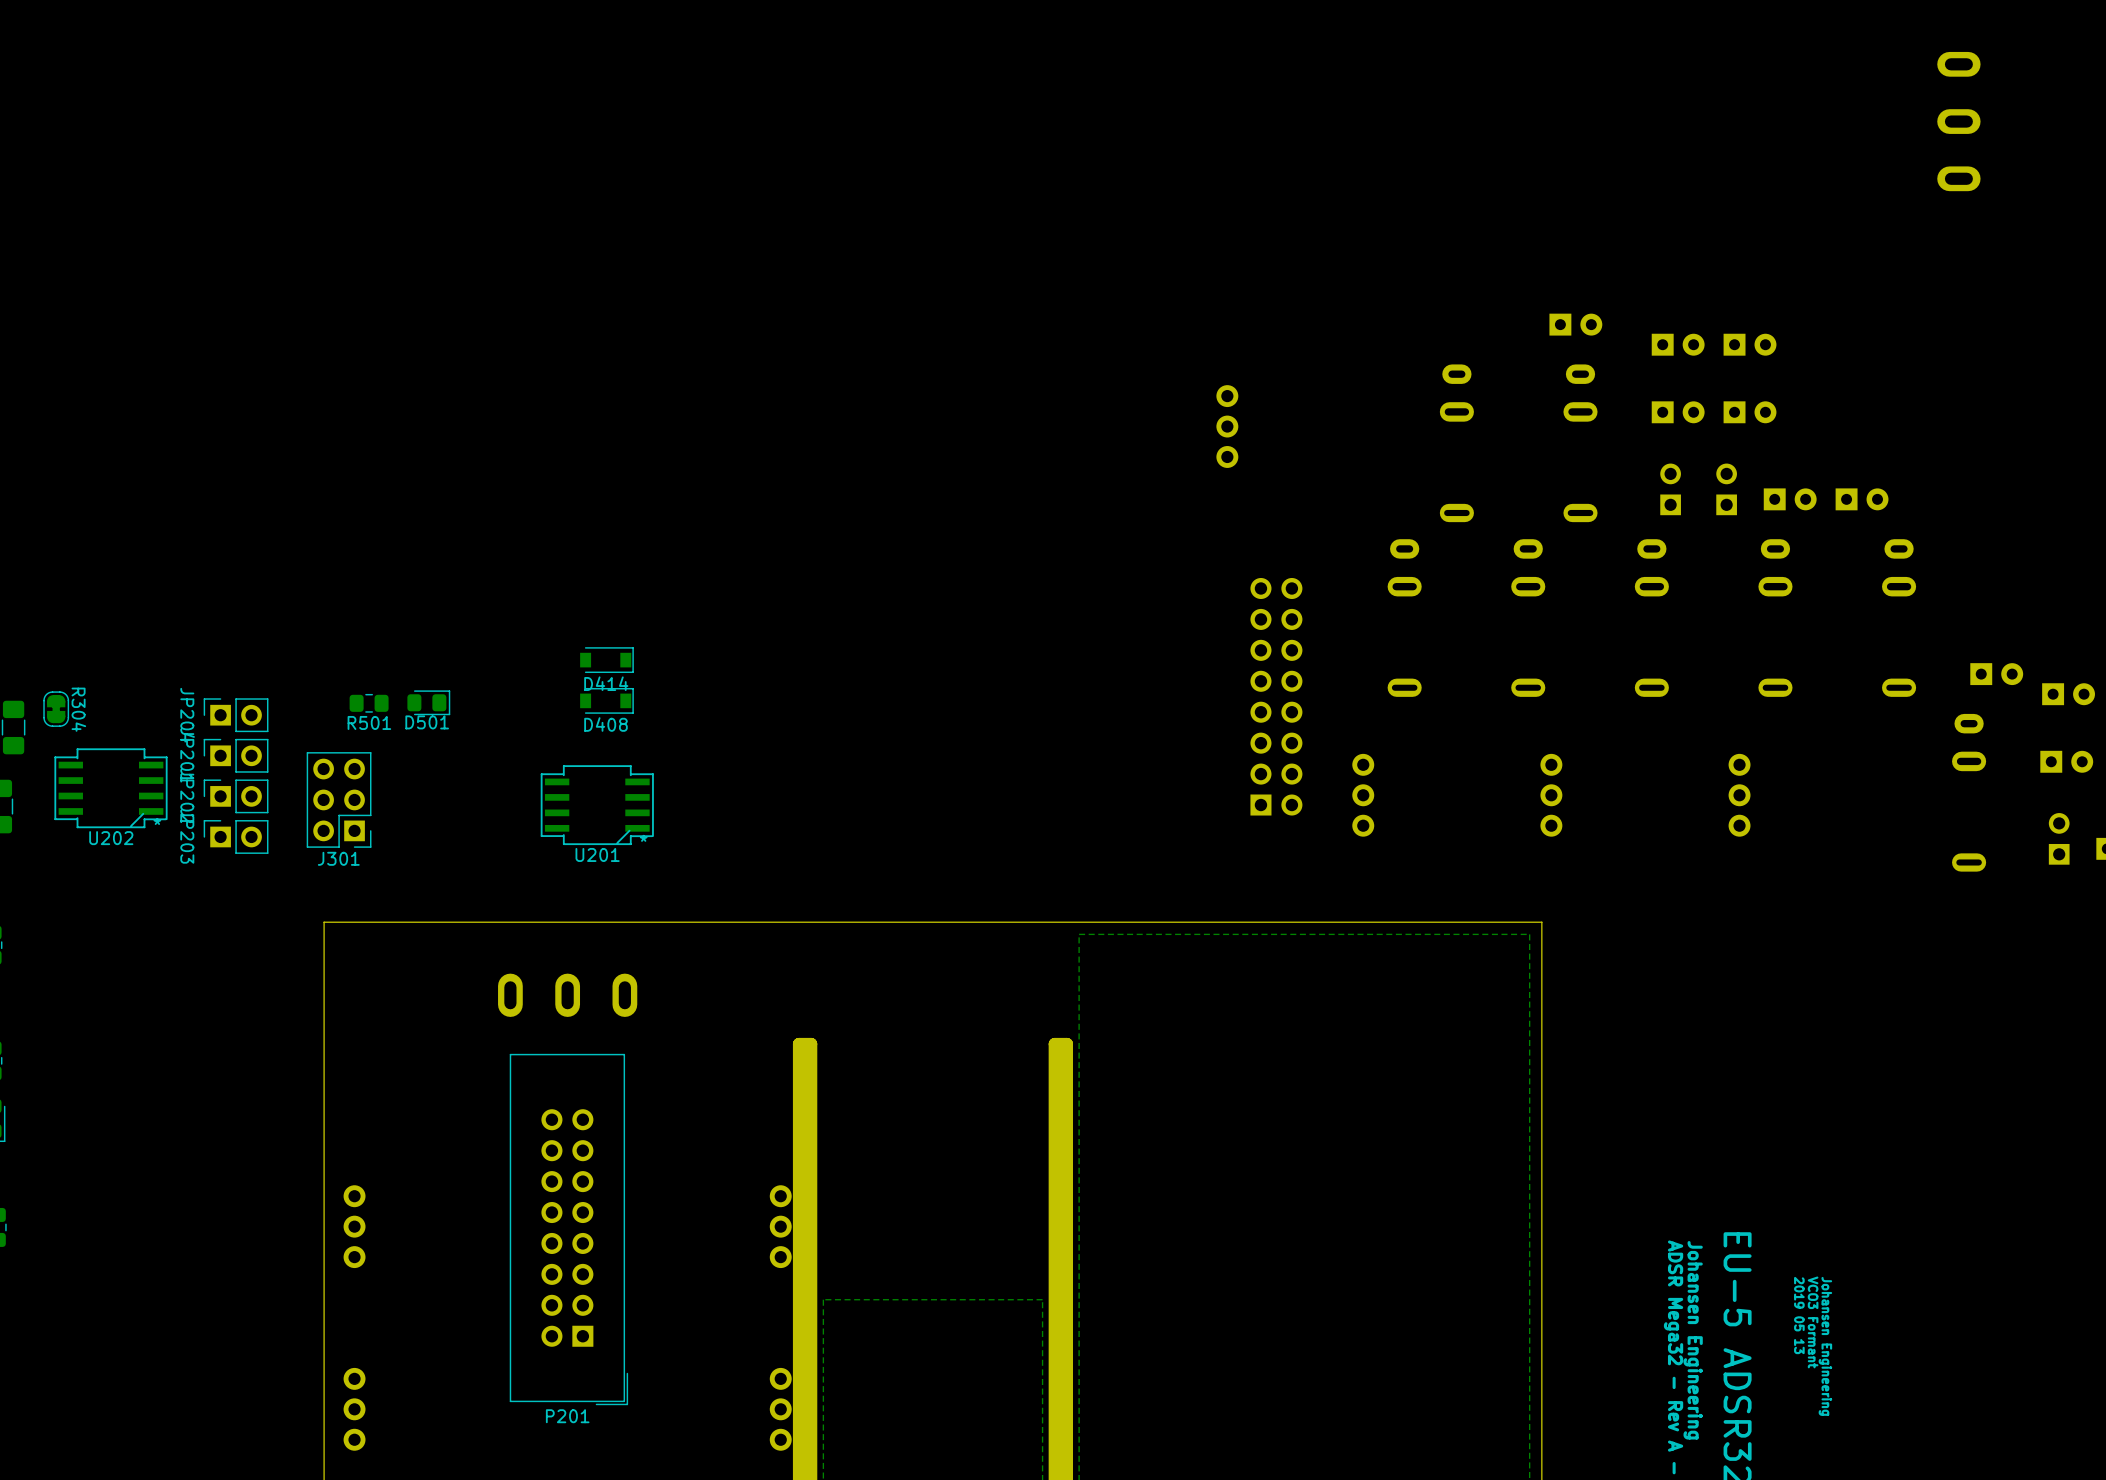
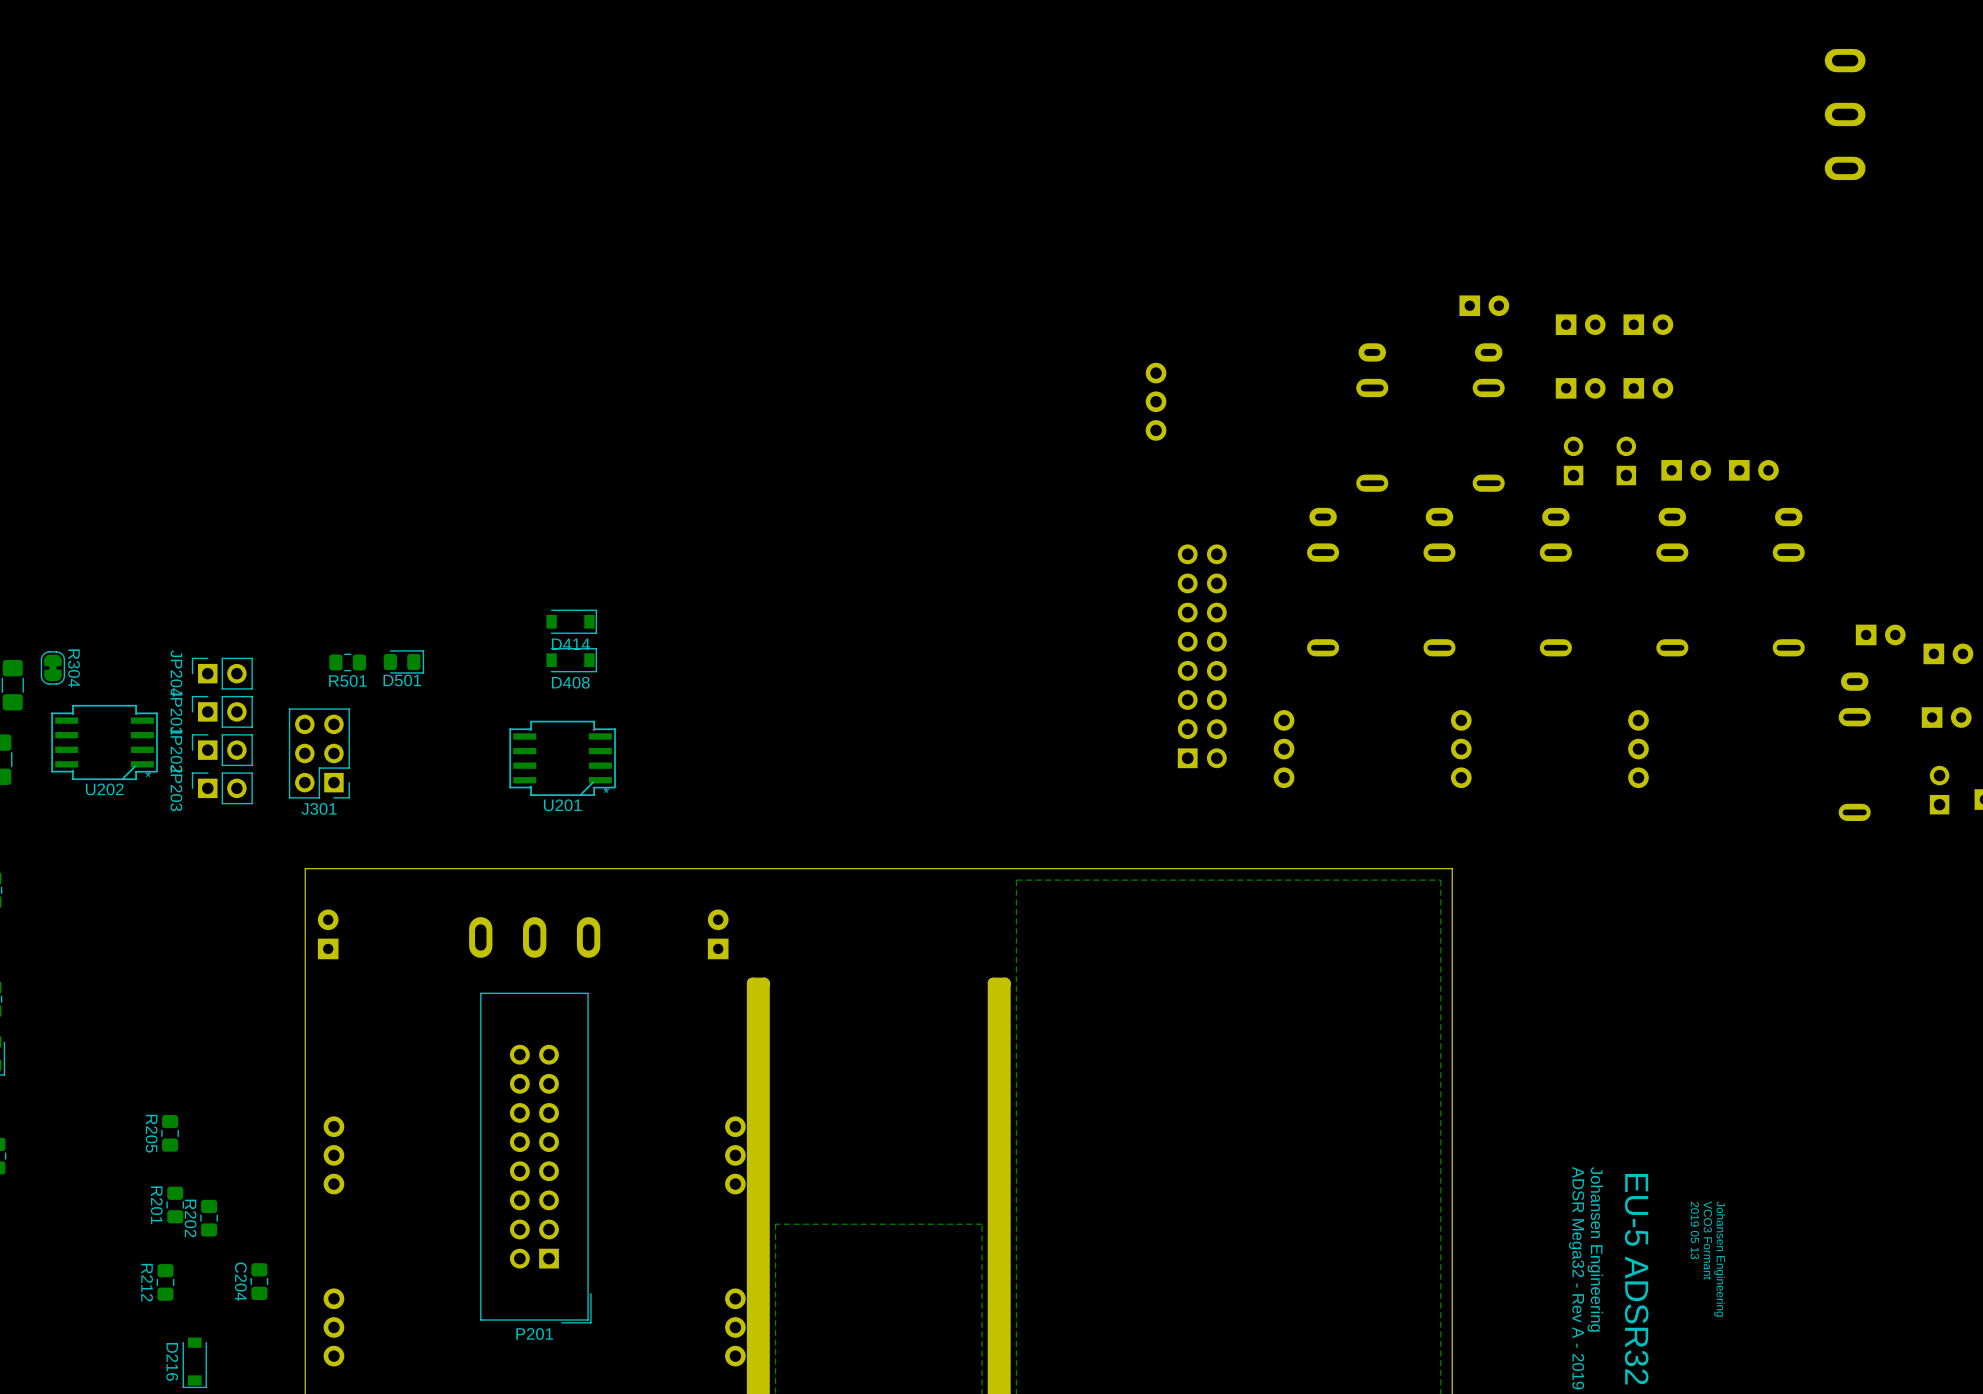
part: none -> (328, 934)
part: none -> (718, 934)
R205: none -> (170, 1133)
R201: none -> (175, 1205)
R202: none -> (209, 1218)
C204: none -> (259, 1281)
R212: none -> (165, 1282)
D216: none -> (194, 1362)

